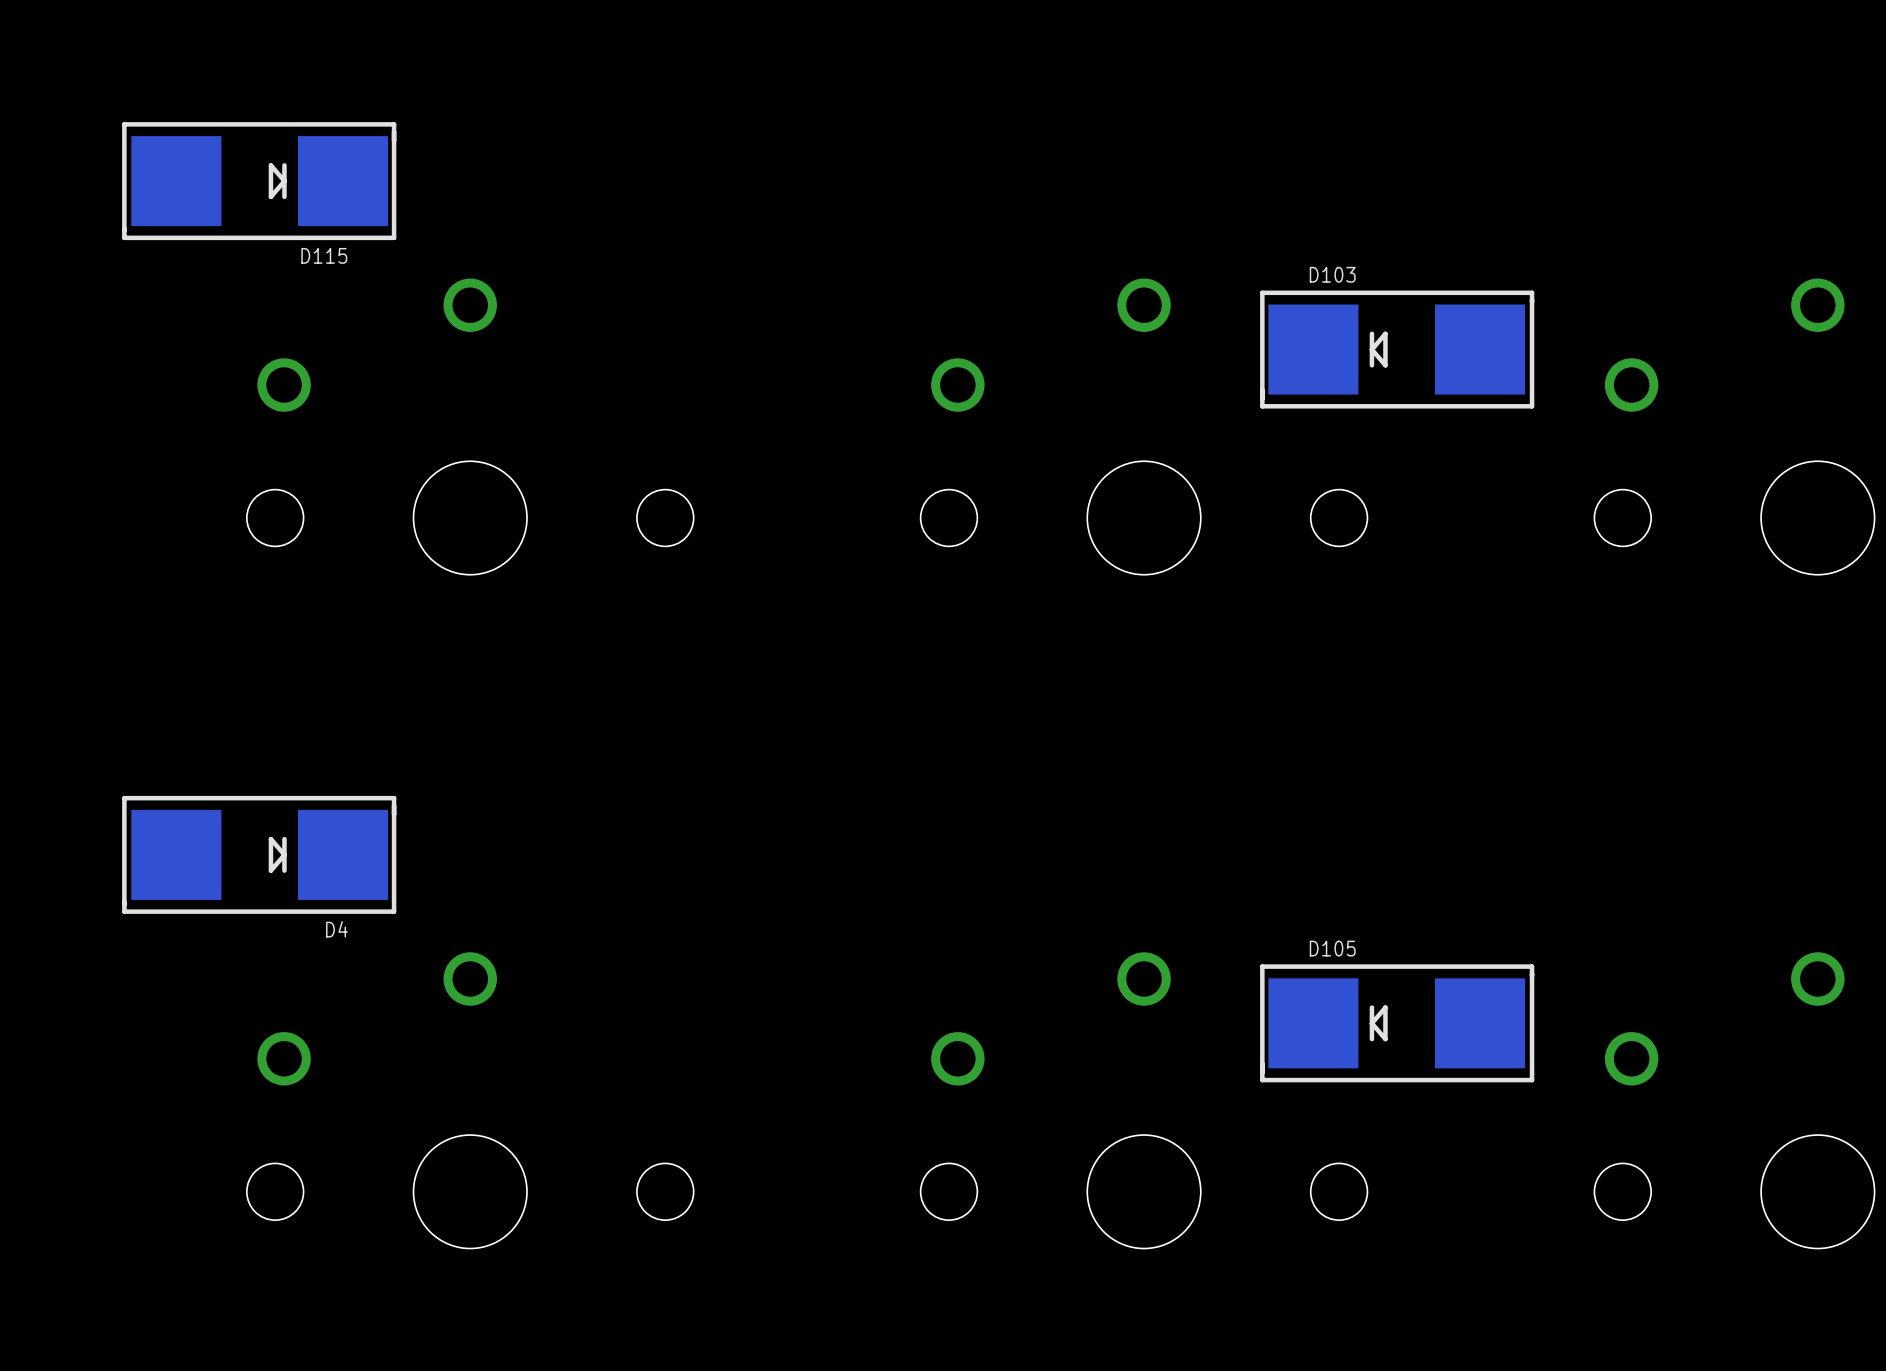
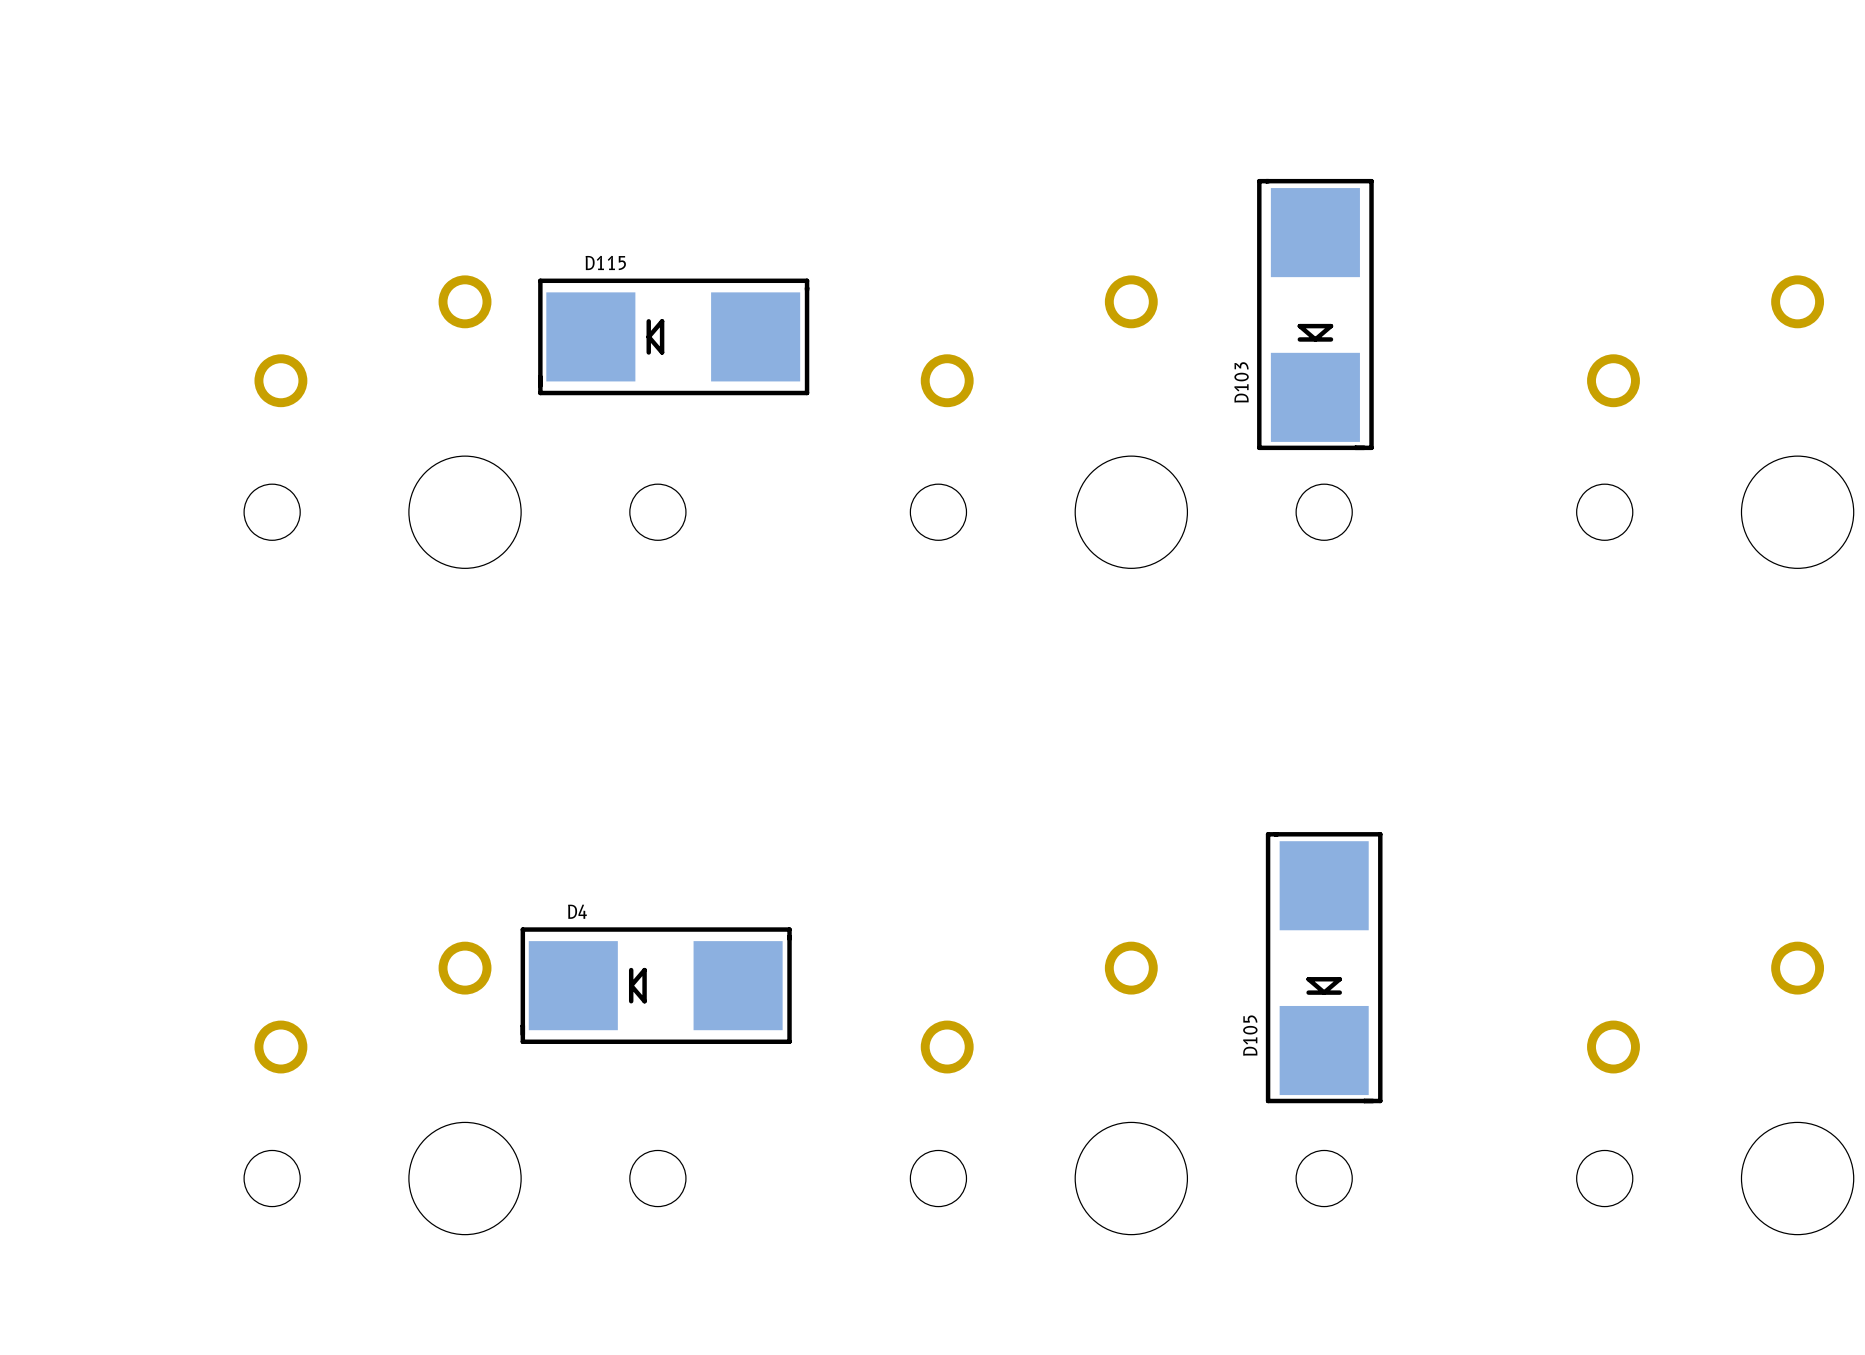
D115 rotation: 0° (259, 181) -> 180° (673, 336)
D115 position: (259, 181) -> (673, 336)
D103 rotation: 0° (1397, 349) -> 90° counterclockwise (1315, 314)
D4 rotation: 0° (259, 854) -> 180° (656, 985)
D4 position: (259, 854) -> (656, 985)
D105 rotation: 0° (1397, 1023) -> 90° counterclockwise (1324, 967)

